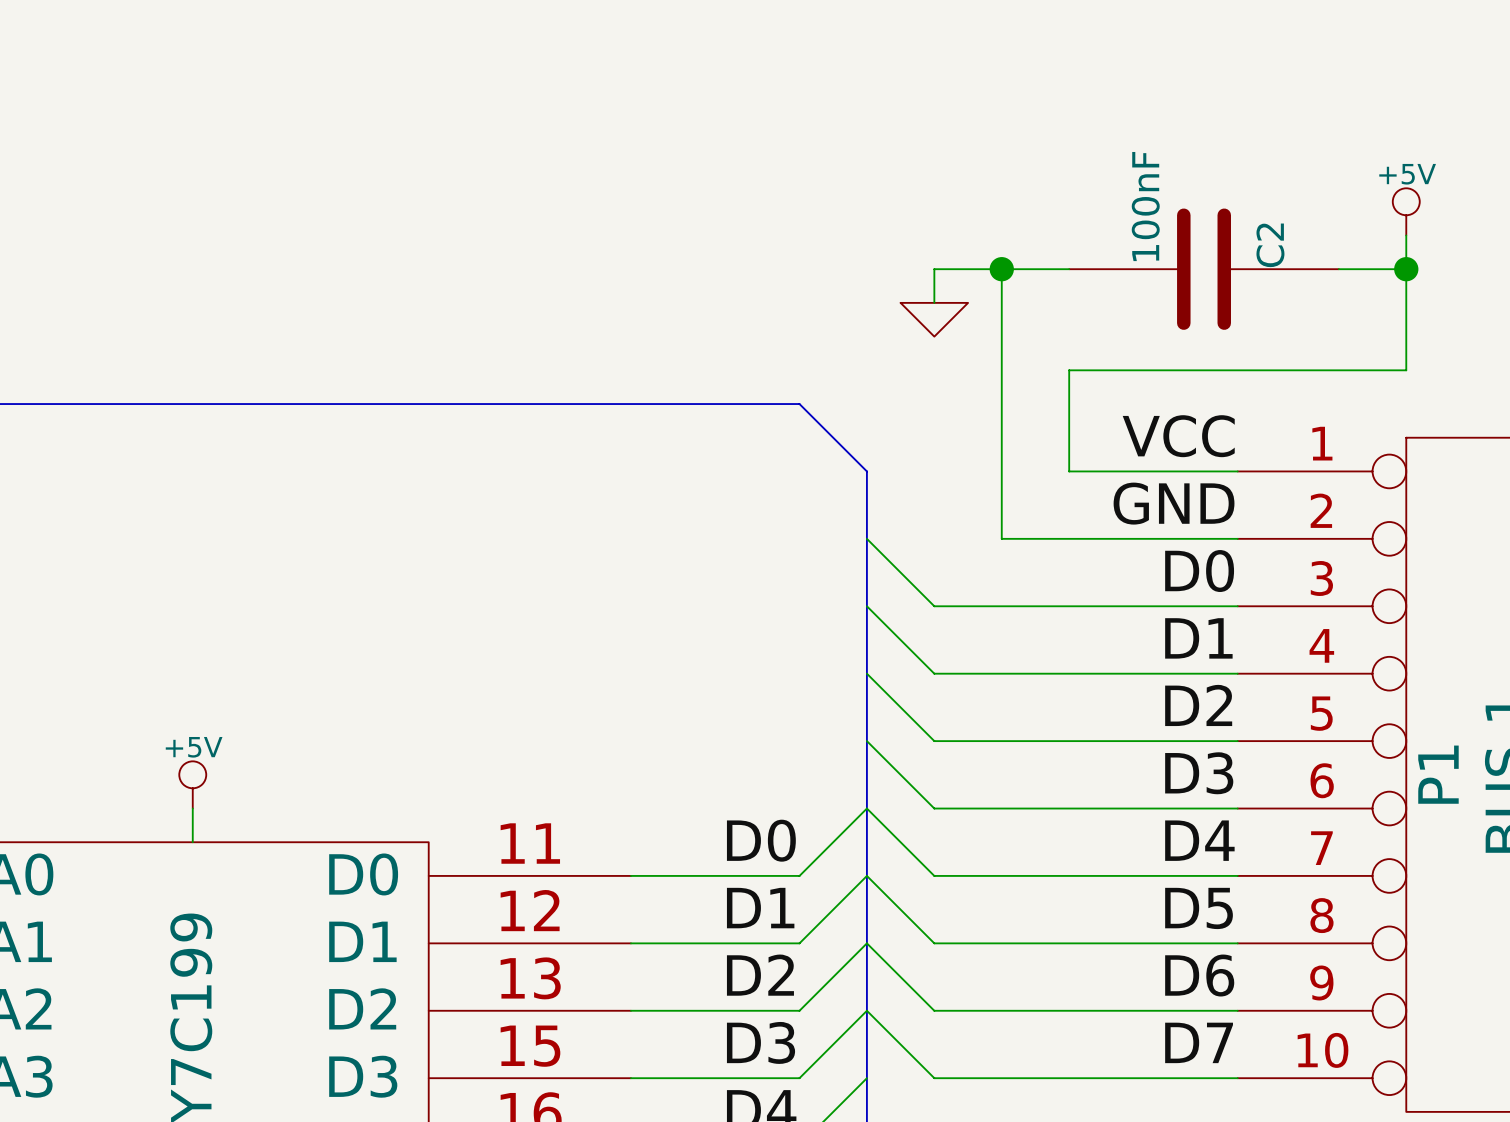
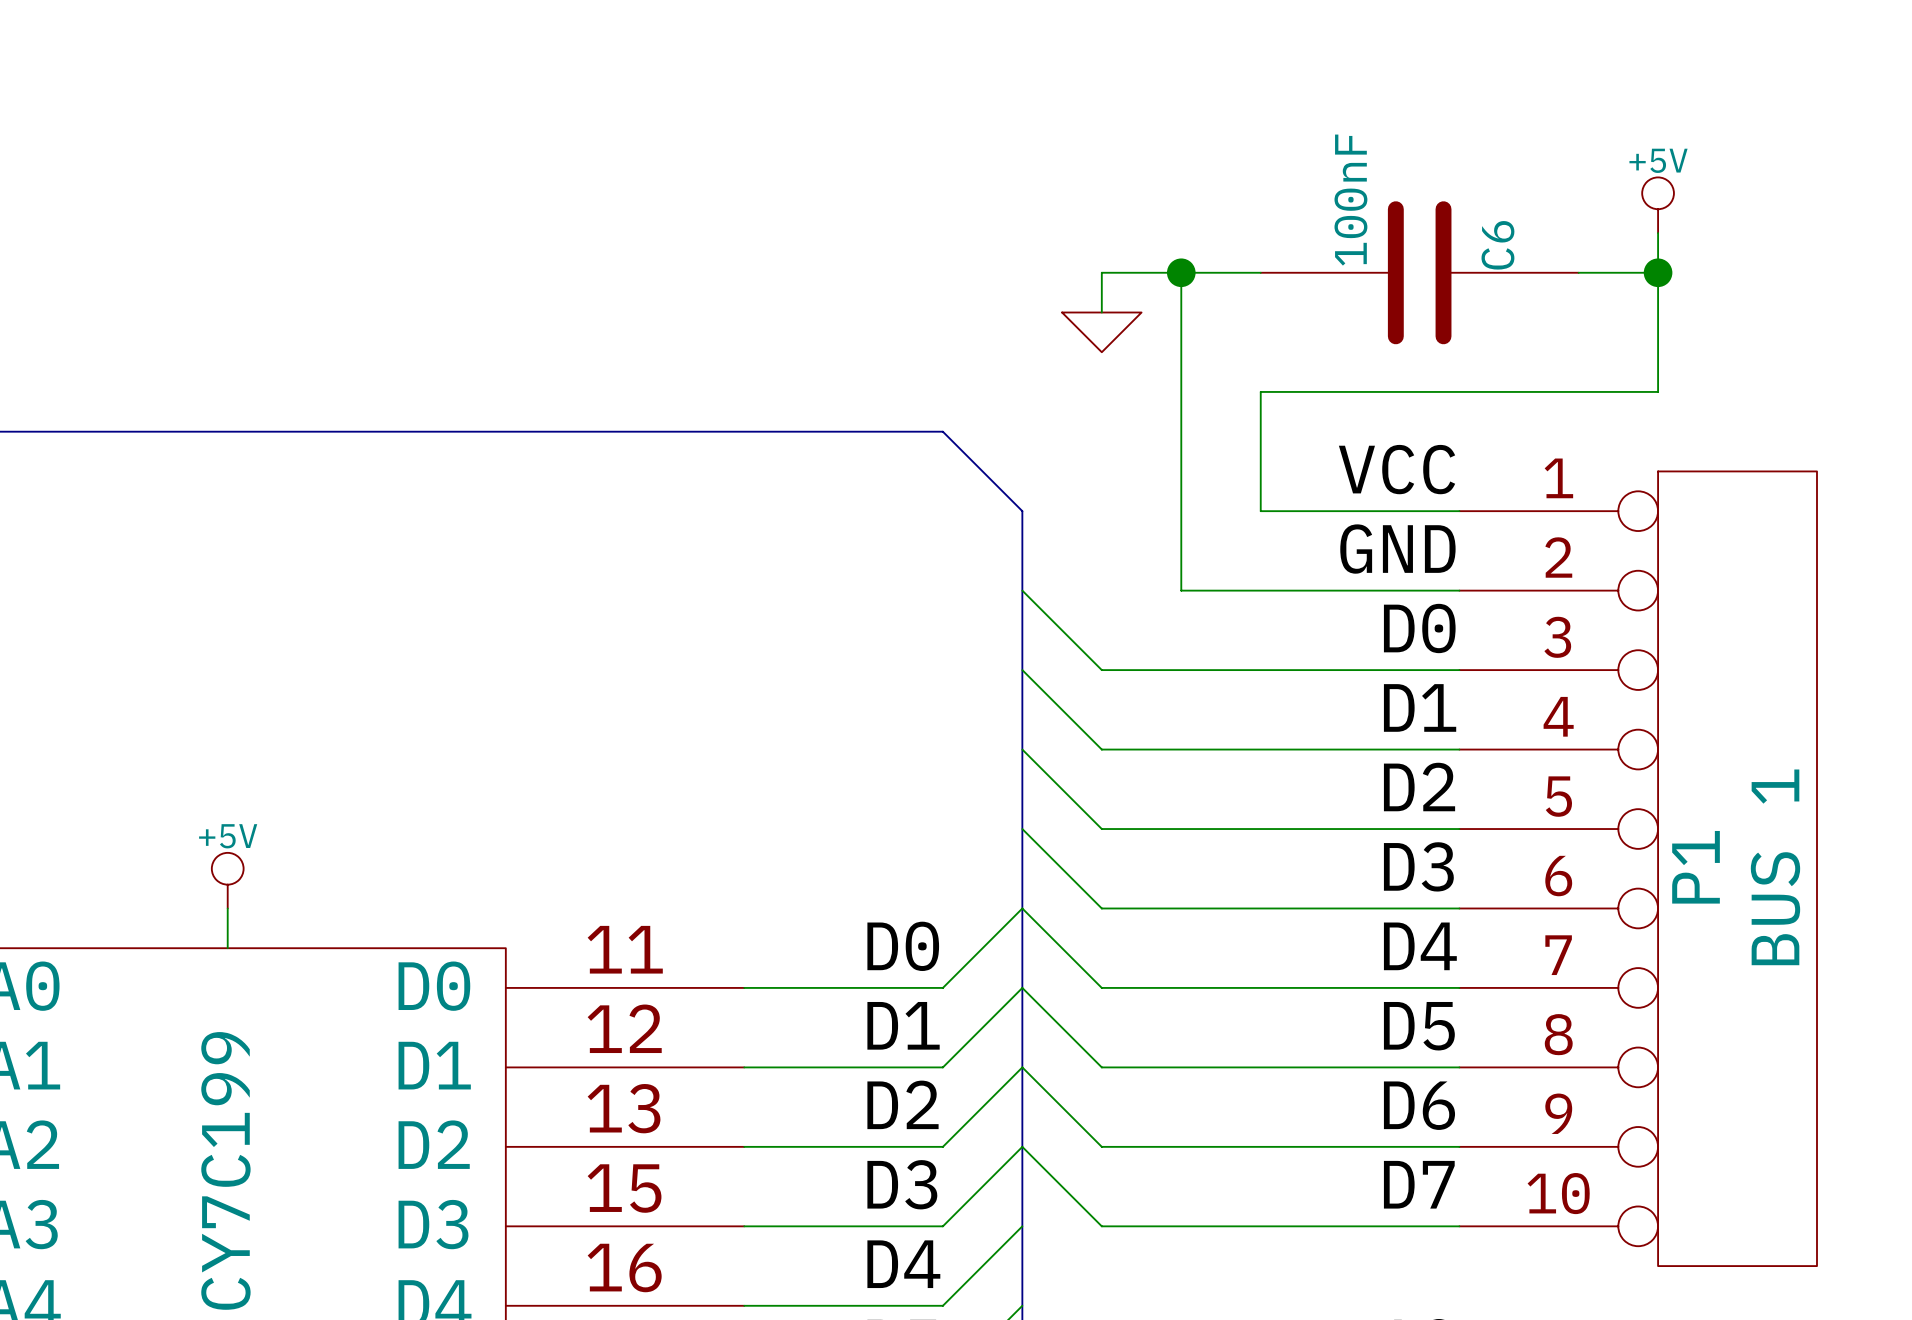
C2 name: C2 (1270, 245) -> C6 (1497, 245)

